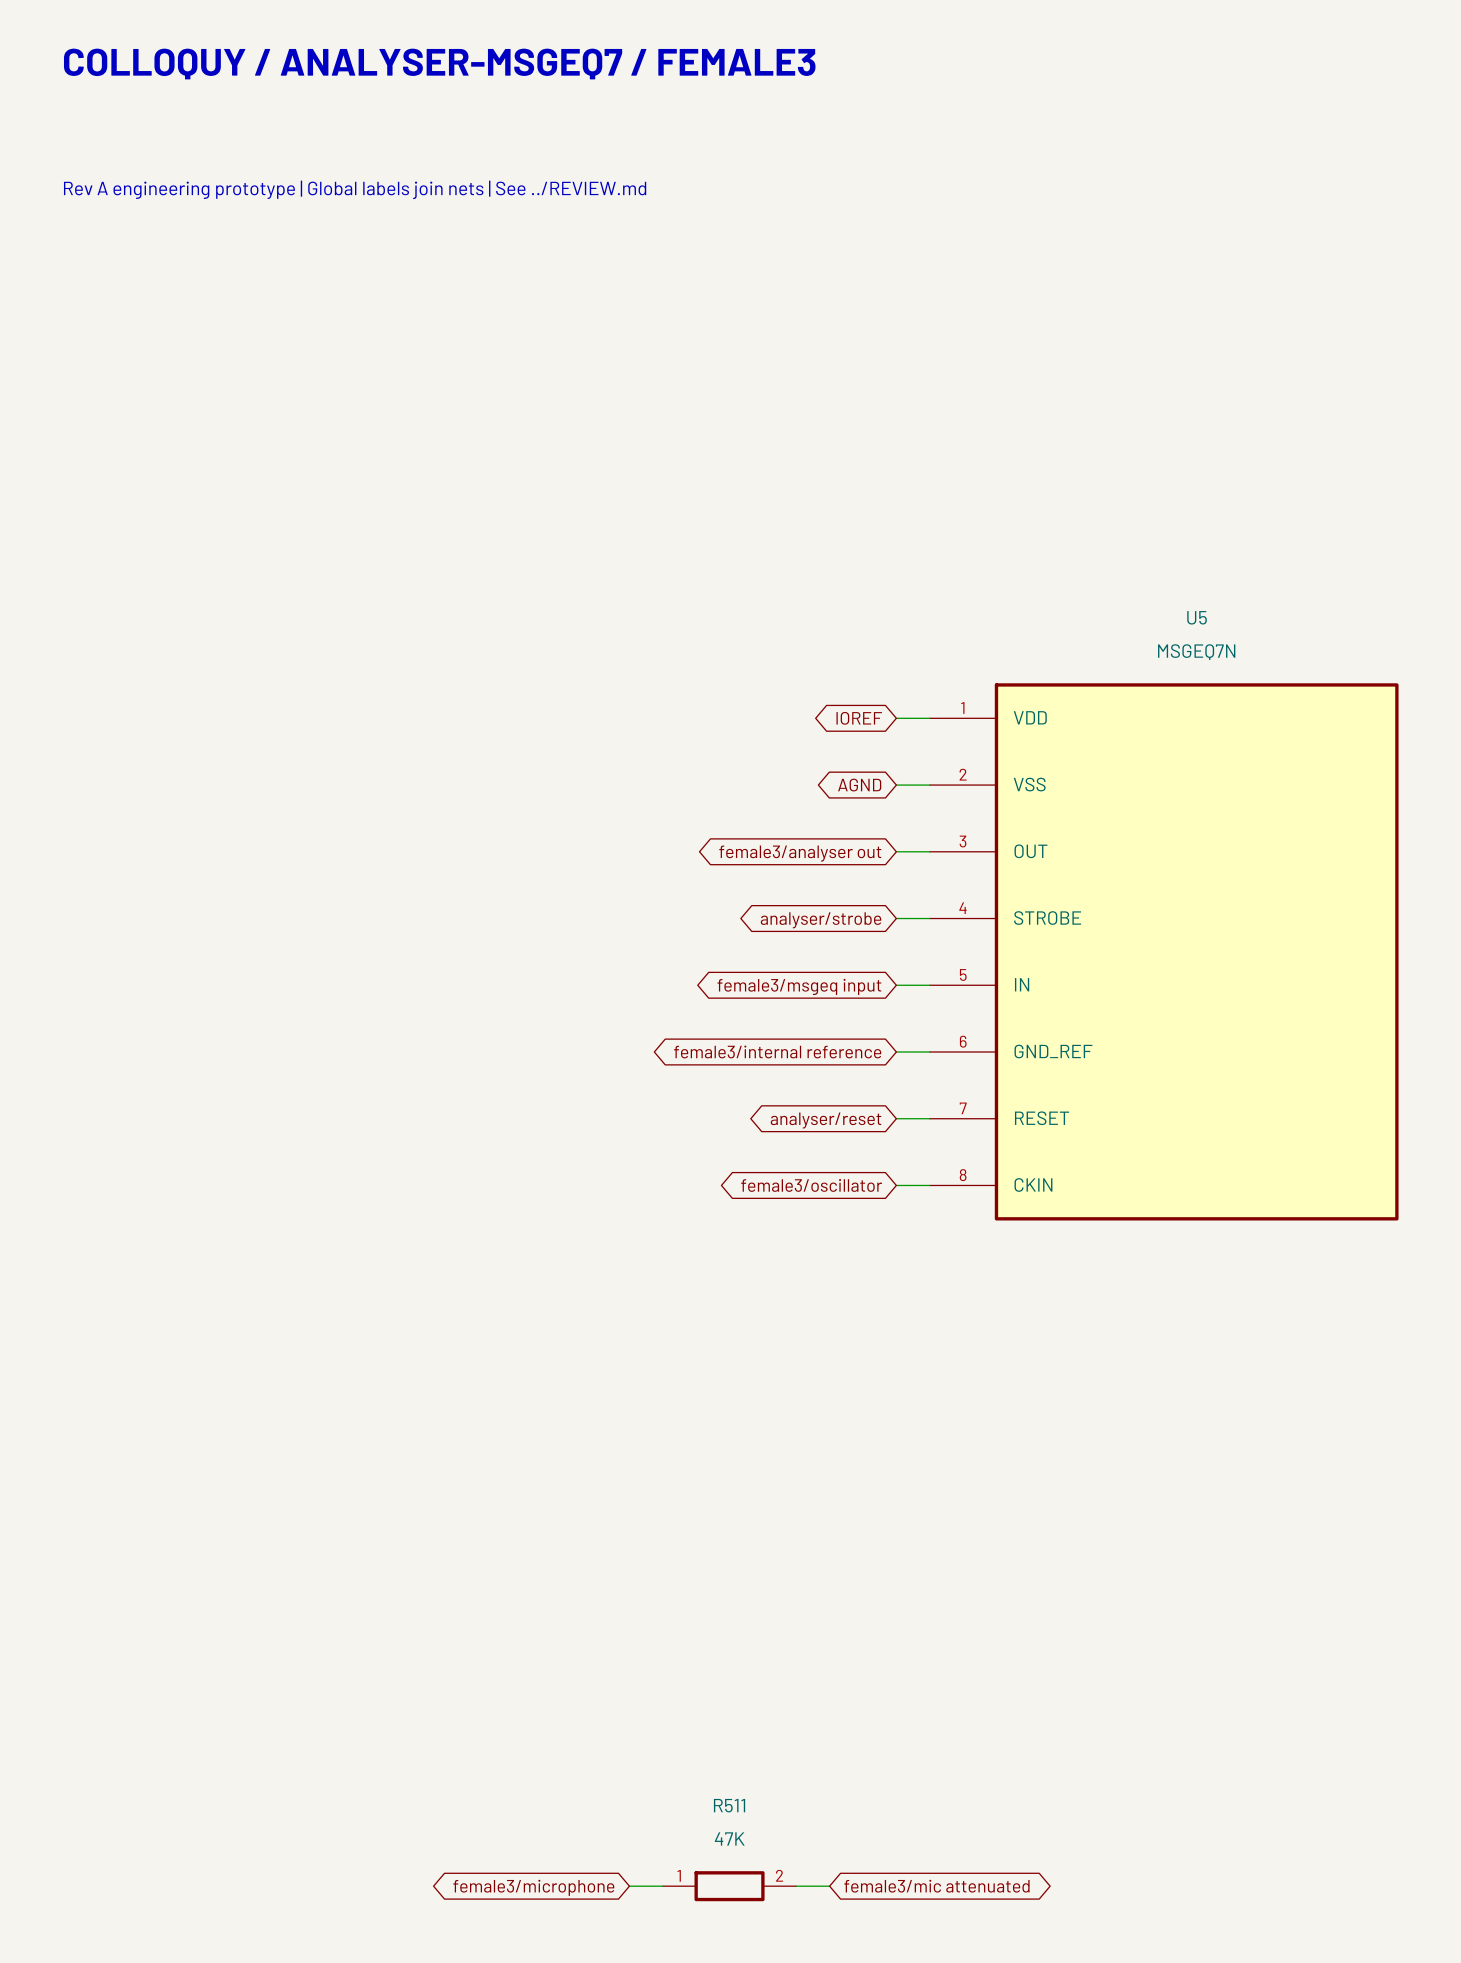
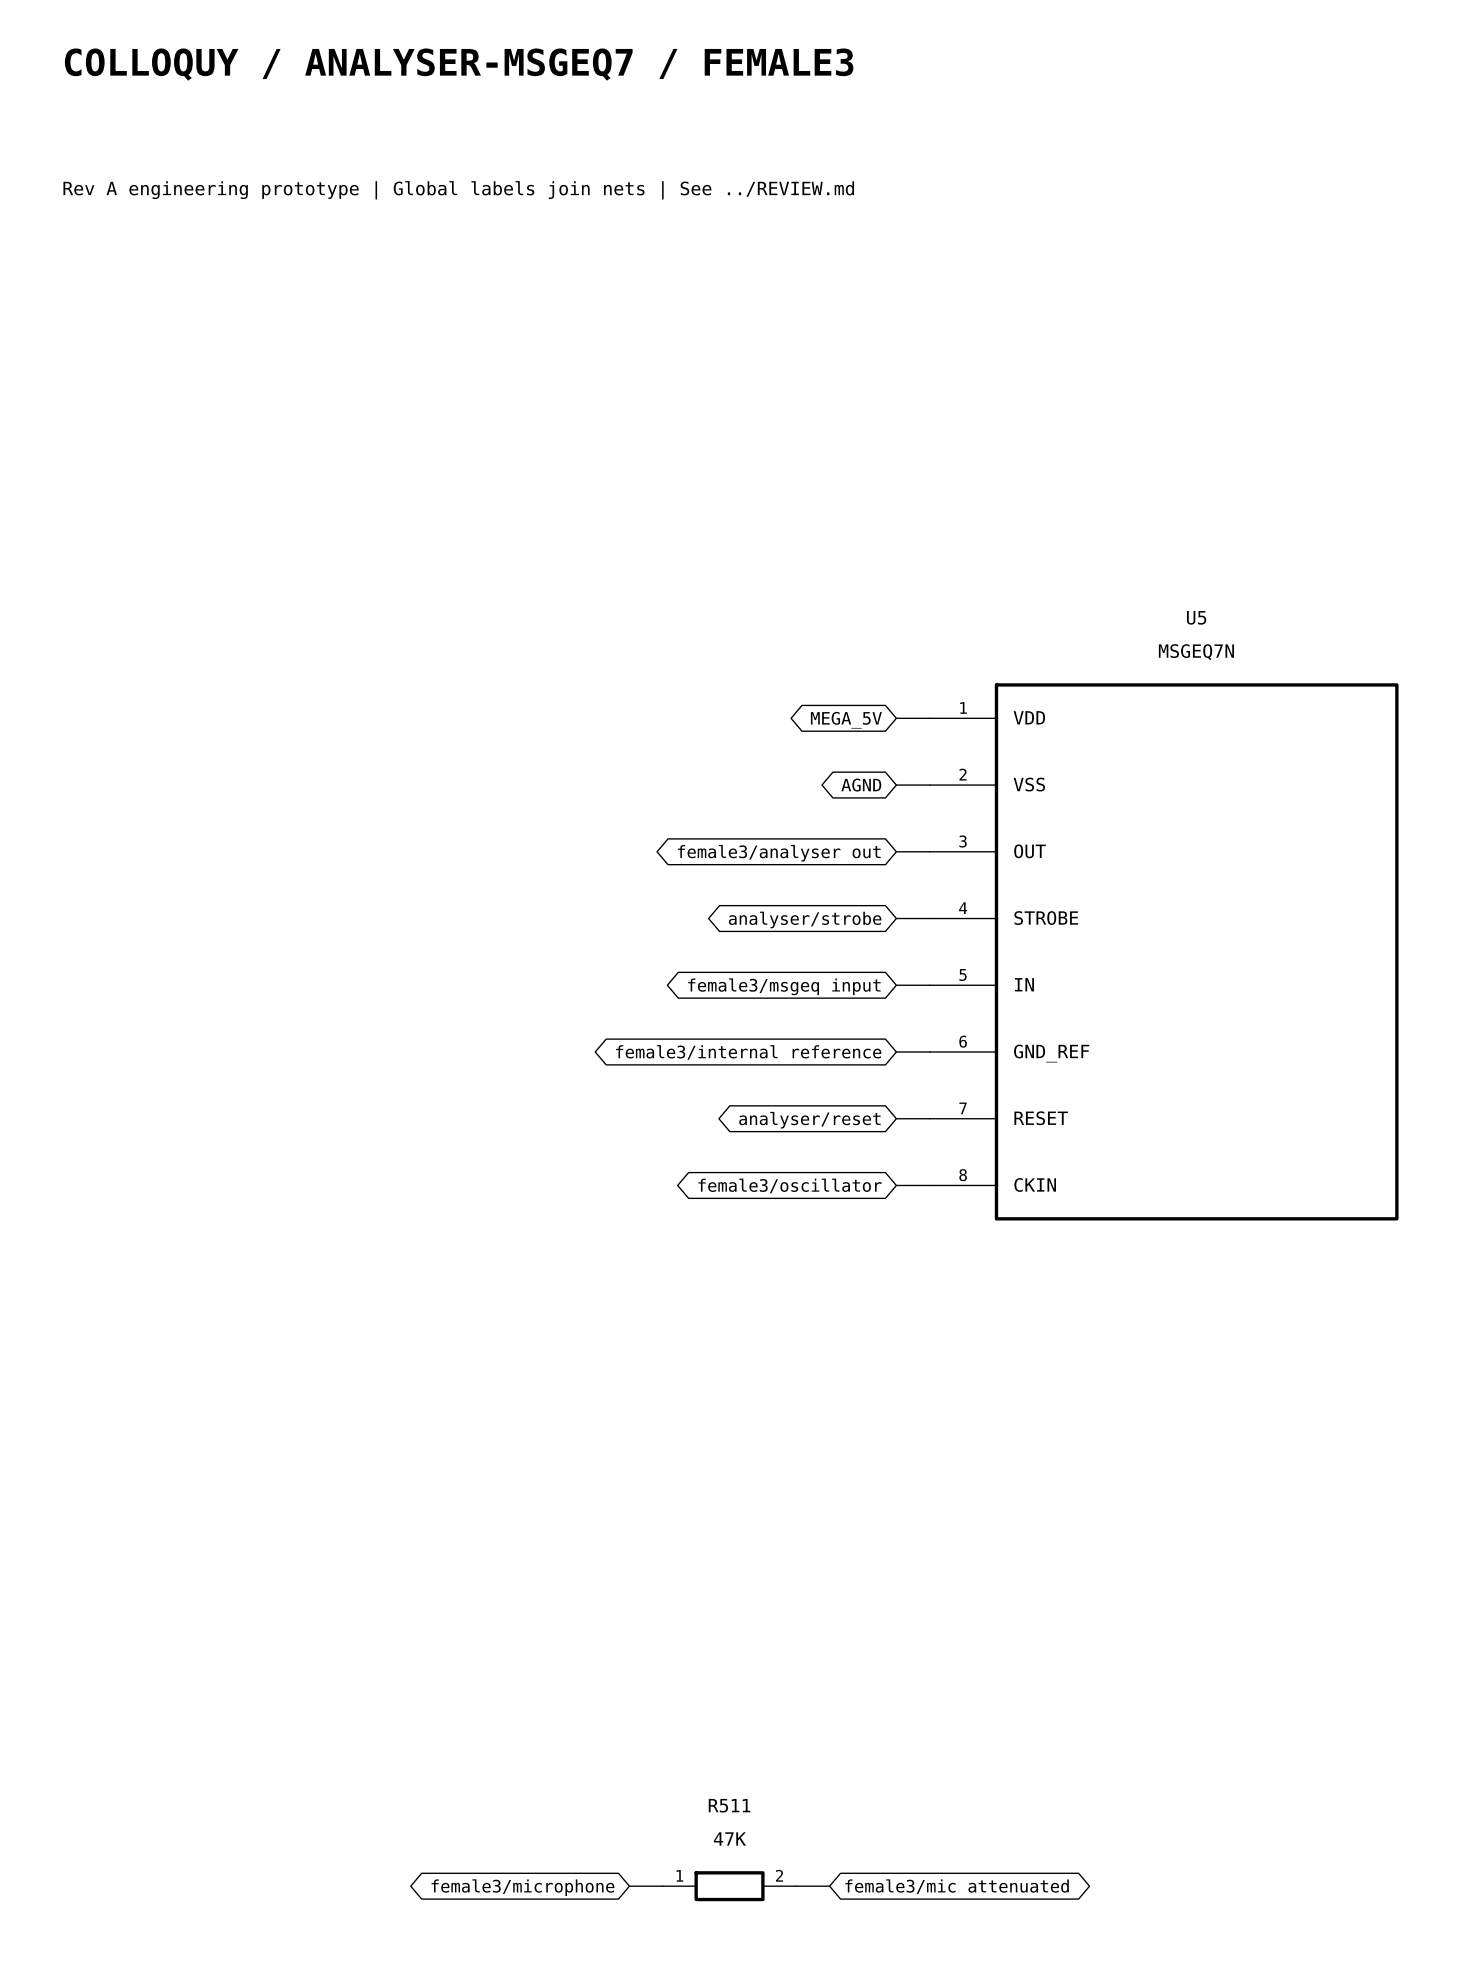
global label: IOREF (859, 718) -> MEGA_5V (846, 720)

